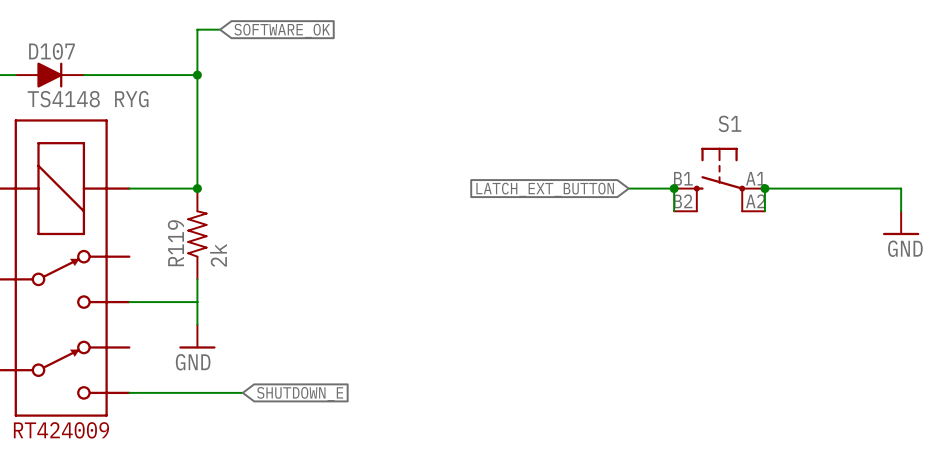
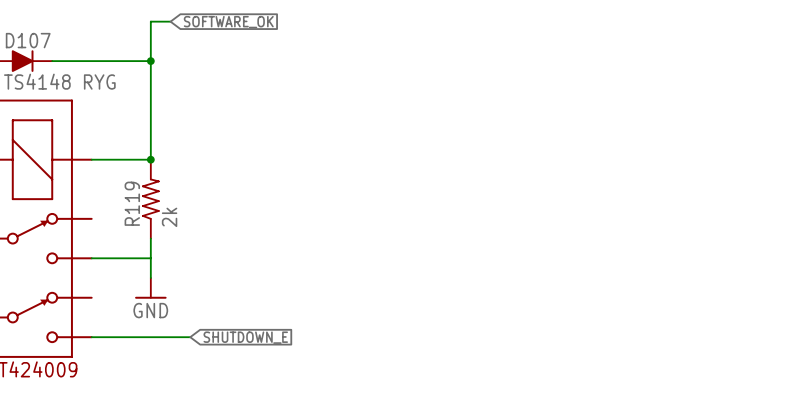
S1: (719, 179) -> none
wire: (628, 188) (674, 188) (674, 211) -> none
junction: (674, 188) -> none
junction: (764, 188) -> none
global label: LATCH_EXT_BUTTON (545, 189) -> none
wire: (764, 211) (764, 188) (901, 188) (901, 211) -> none
power symbol: GND (901, 223) -> none

